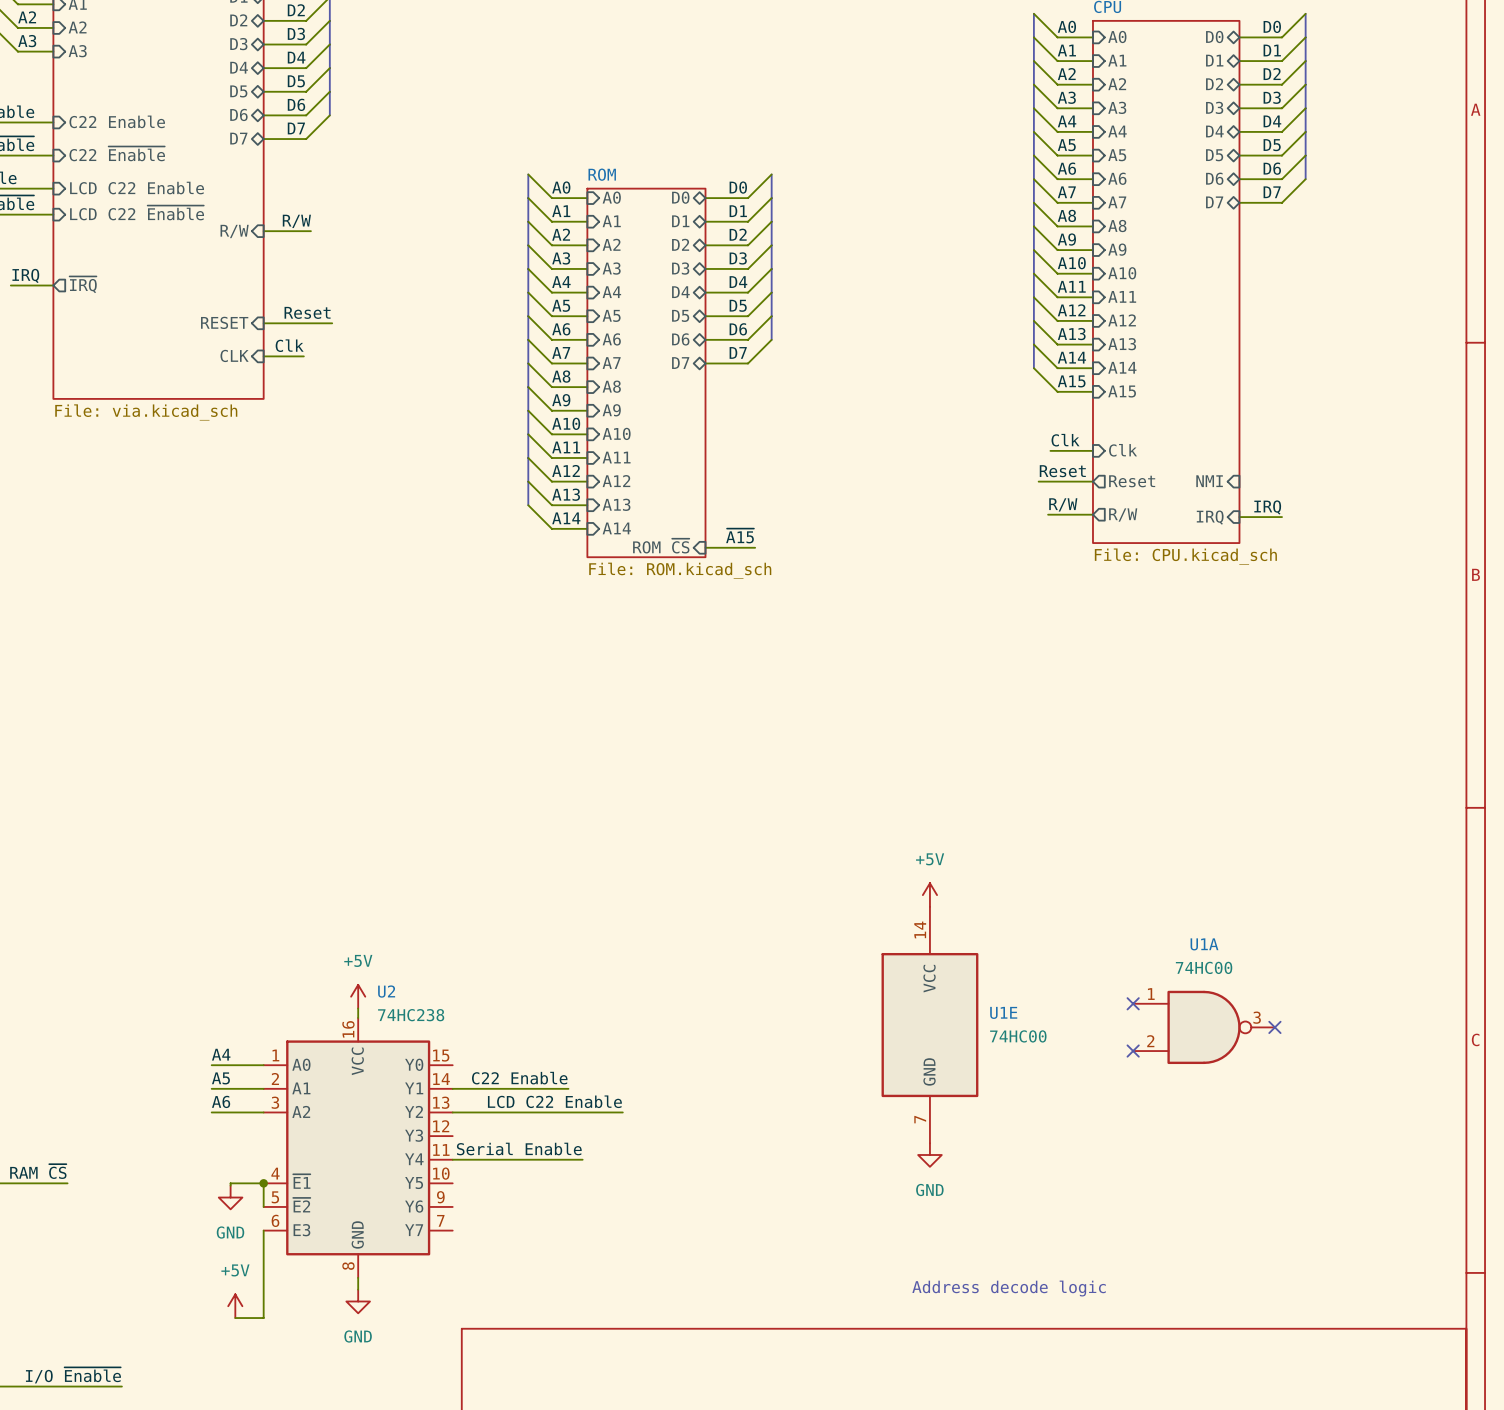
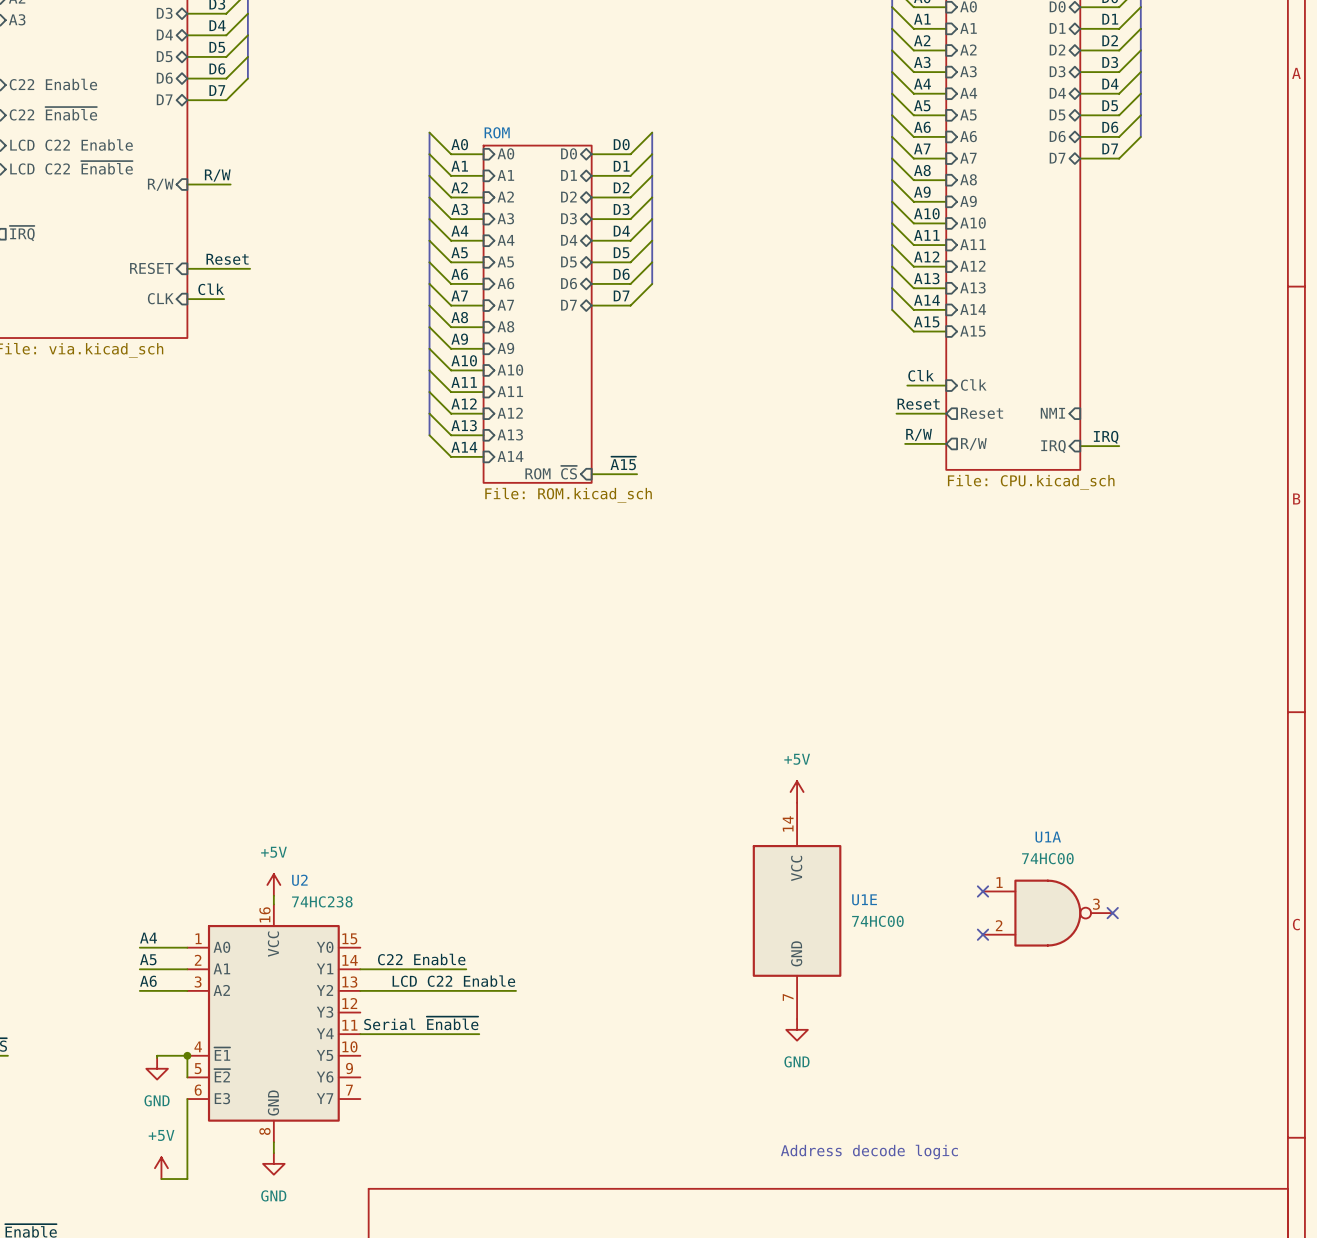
label: Serial Enable (519, 1149) -> Serial ~{Enable} (421, 1023)

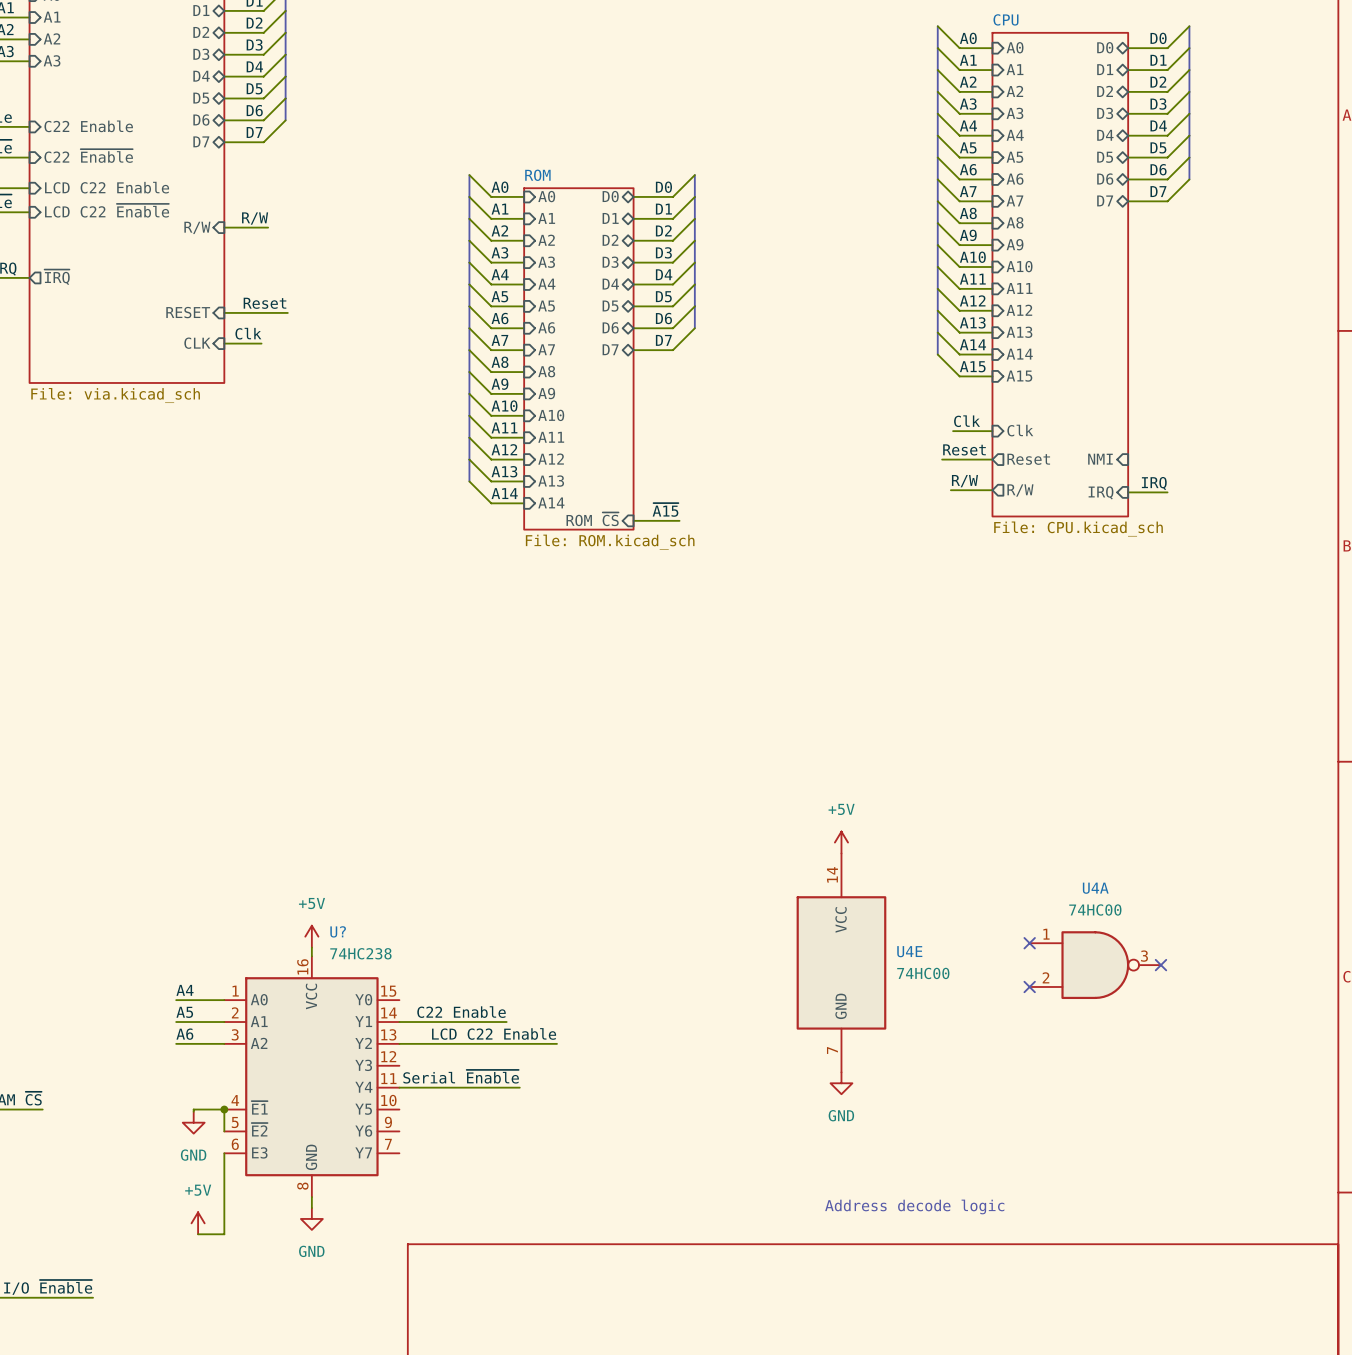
U1A name: U1A (1048, 837) -> U4A (1095, 888)
U2 name: U2 (299, 880) -> U? (338, 931)
U1E name: U1E (864, 899) -> U4E (909, 951)

